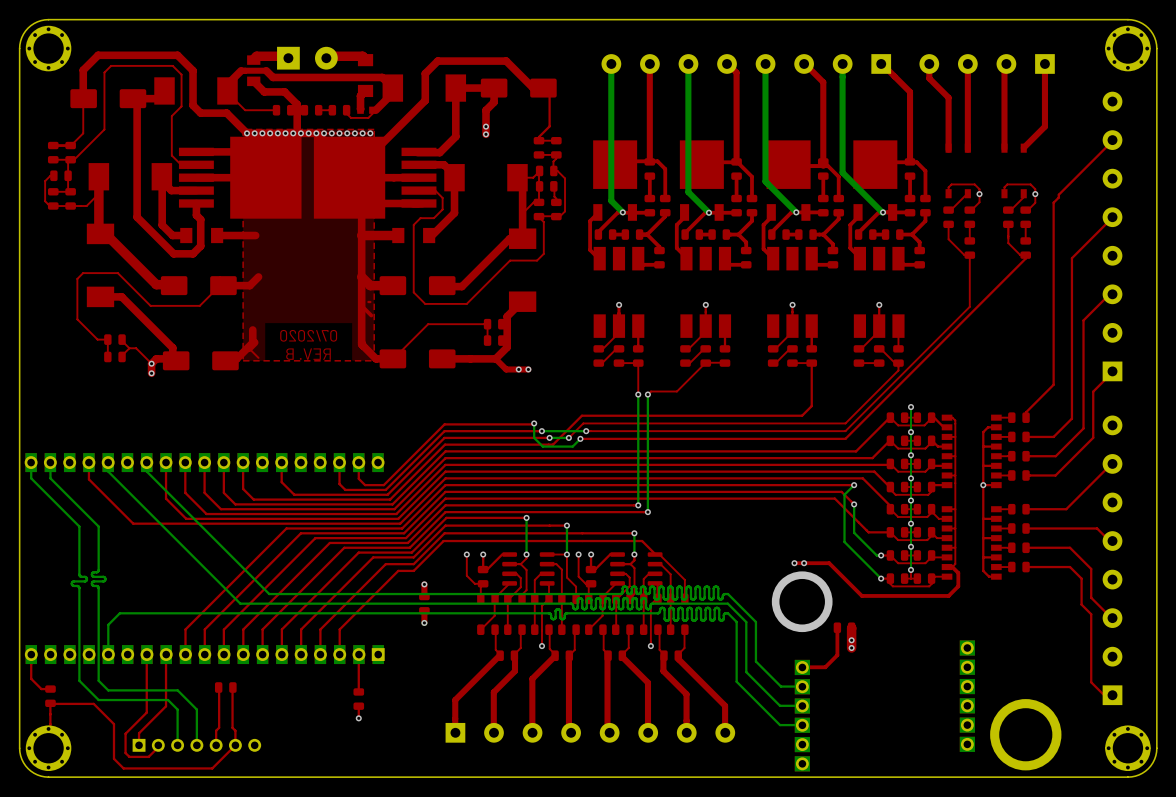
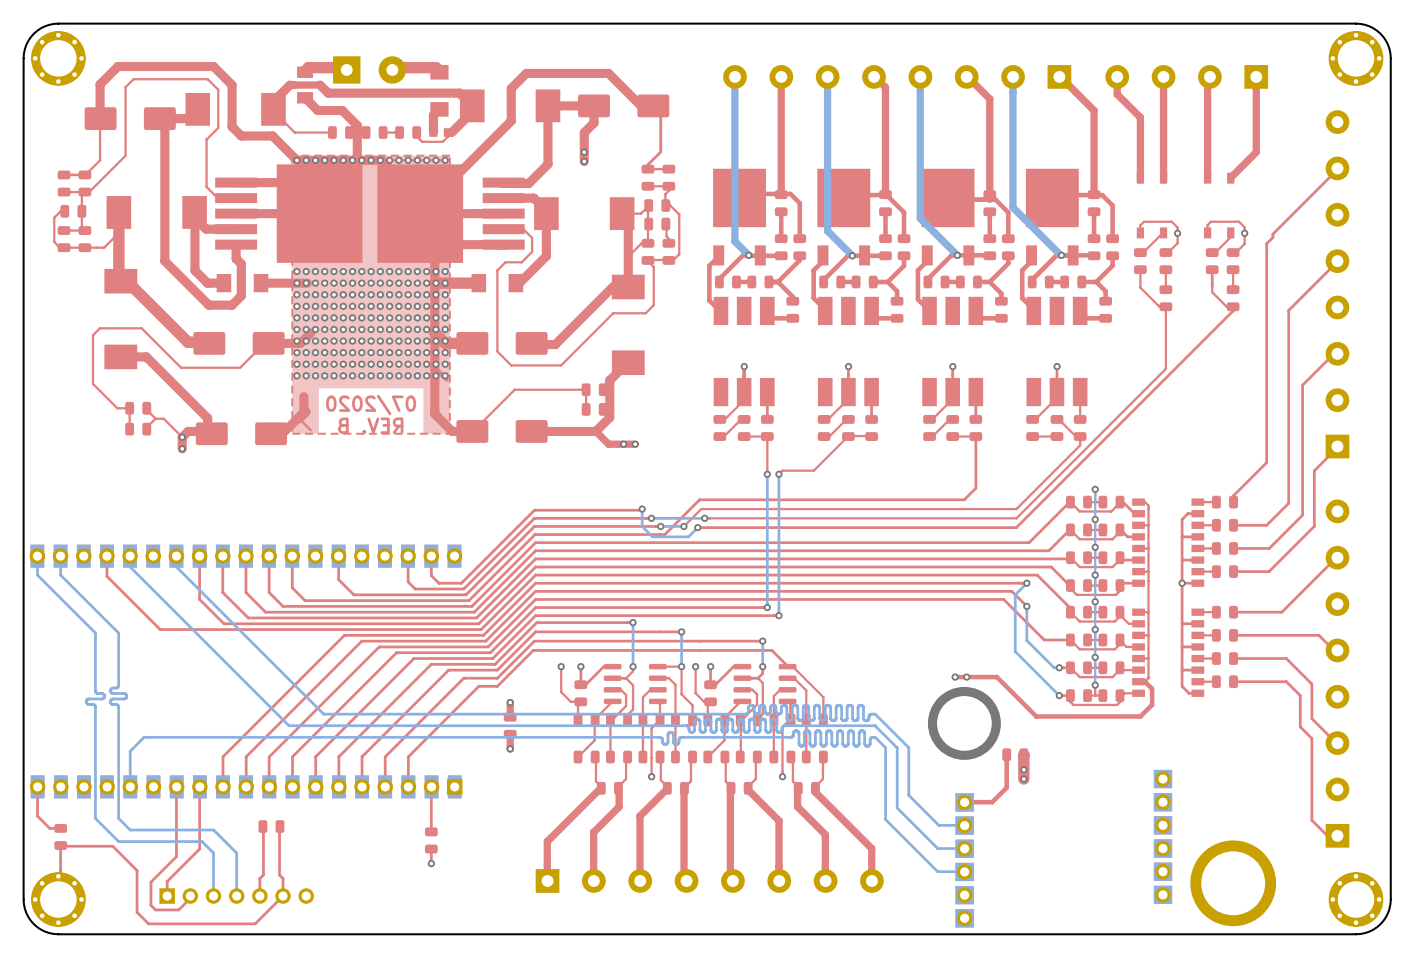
via: none -> (296, 271)
via: none -> (306, 271)
via: none -> (315, 271)
via: none -> (324, 271)
via: none -> (334, 271)
via: none -> (343, 271)
via: none -> (352, 271)
via: none -> (361, 271)
via: none -> (371, 271)
via: none -> (380, 271)
via: none -> (389, 271)
via: none -> (398, 271)
via: none -> (408, 271)
via: none -> (417, 271)
via: none -> (426, 271)
via: none -> (435, 271)
via: none -> (445, 271)
via: none -> (296, 283)
via: none -> (306, 283)
via: none -> (315, 283)
via: none -> (324, 283)
via: none -> (334, 283)
via: none -> (343, 283)
via: none -> (352, 283)
via: none -> (361, 283)
via: none -> (371, 283)
via: none -> (380, 283)
via: none -> (389, 283)
via: none -> (398, 283)
via: none -> (408, 283)
via: none -> (417, 283)
via: none -> (426, 283)
via: none -> (435, 283)
via: none -> (445, 283)
via: none -> (296, 294)
via: none -> (306, 294)
via: none -> (315, 294)
via: none -> (324, 294)
via: none -> (334, 294)
via: none -> (343, 294)
via: none -> (352, 294)
via: none -> (361, 294)
via: none -> (371, 294)
via: none -> (380, 294)
via: none -> (389, 294)
via: none -> (398, 294)
via: none -> (408, 294)
via: none -> (417, 294)
via: none -> (426, 294)
via: none -> (435, 294)
via: none -> (445, 294)
via: none -> (296, 306)
via: none -> (306, 306)
via: none -> (315, 306)
via: none -> (324, 306)
via: none -> (334, 306)
via: none -> (343, 306)
via: none -> (352, 306)
via: none -> (361, 306)
via: none -> (371, 306)
via: none -> (380, 306)
via: none -> (389, 306)
via: none -> (398, 306)
via: none -> (408, 306)
via: none -> (417, 306)
via: none -> (426, 306)
via: none -> (435, 306)
via: none -> (445, 306)
via: none -> (296, 317)
via: none -> (306, 317)
via: none -> (315, 317)
via: none -> (324, 317)
via: none -> (334, 317)
via: none -> (343, 317)
via: none -> (352, 317)
via: none -> (361, 317)
via: none -> (371, 317)
via: none -> (380, 317)
via: none -> (389, 317)
via: none -> (398, 317)
via: none -> (408, 317)
via: none -> (417, 317)
via: none -> (426, 317)
via: none -> (435, 317)
via: none -> (445, 317)
via: none -> (296, 329)
via: none -> (306, 329)
via: none -> (315, 329)
via: none -> (324, 329)
via: none -> (334, 329)
via: none -> (343, 329)
via: none -> (352, 329)
via: none -> (361, 329)
via: none -> (371, 329)
via: none -> (380, 329)
via: none -> (389, 329)
via: none -> (398, 329)
via: none -> (408, 329)
via: none -> (417, 329)
via: none -> (426, 329)
via: none -> (435, 329)
via: none -> (445, 329)
via: none -> (296, 341)
via: none -> (306, 341)
via: none -> (315, 341)
via: none -> (324, 341)
via: none -> (334, 341)
via: none -> (343, 341)
via: none -> (352, 341)
via: none -> (361, 341)
via: none -> (371, 341)
via: none -> (380, 341)
via: none -> (389, 341)
via: none -> (398, 341)
via: none -> (408, 341)
via: none -> (417, 341)
via: none -> (426, 341)
via: none -> (435, 341)
via: none -> (445, 341)
via: none -> (296, 352)
via: none -> (306, 352)
via: none -> (315, 352)
via: none -> (324, 352)
via: none -> (334, 352)
via: none -> (343, 352)
via: none -> (352, 352)
via: none -> (361, 352)
via: none -> (371, 352)
via: none -> (380, 352)
via: none -> (389, 352)
via: none -> (398, 352)
via: none -> (408, 352)
via: none -> (417, 352)
via: none -> (426, 352)
via: none -> (435, 352)
via: none -> (445, 352)
via: none -> (296, 364)
via: none -> (306, 364)
via: none -> (315, 364)
via: none -> (324, 364)
via: none -> (334, 364)
via: none -> (343, 364)
via: none -> (352, 364)
via: none -> (361, 364)
via: none -> (371, 364)
via: none -> (380, 364)
via: none -> (389, 364)
via: none -> (398, 364)
via: none -> (408, 364)
via: none -> (417, 364)
via: none -> (426, 364)
via: none -> (435, 364)
via: none -> (445, 364)
via: none -> (296, 375)
via: none -> (306, 375)
via: none -> (315, 375)
via: none -> (324, 375)
via: none -> (334, 375)
via: none -> (343, 375)
via: none -> (352, 375)
via: none -> (361, 375)
via: none -> (371, 375)
via: none -> (380, 375)
via: none -> (389, 375)
via: none -> (398, 375)
via: none -> (408, 375)
via: none -> (417, 375)
via: none -> (426, 375)
via: none -> (435, 375)
via: none -> (445, 375)

